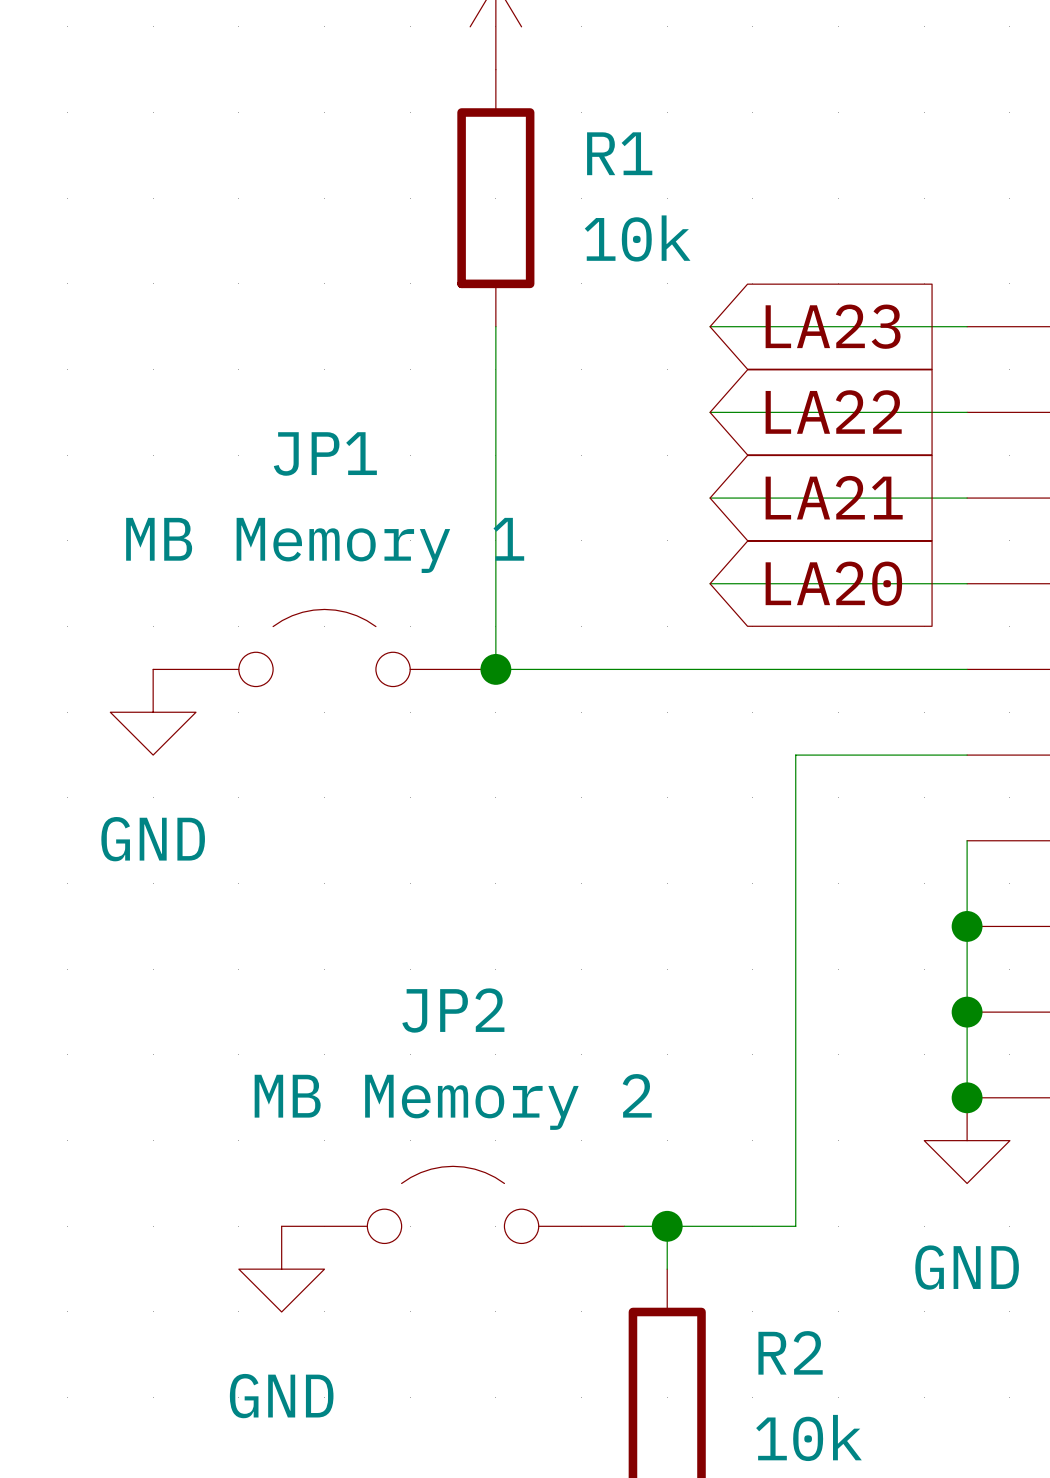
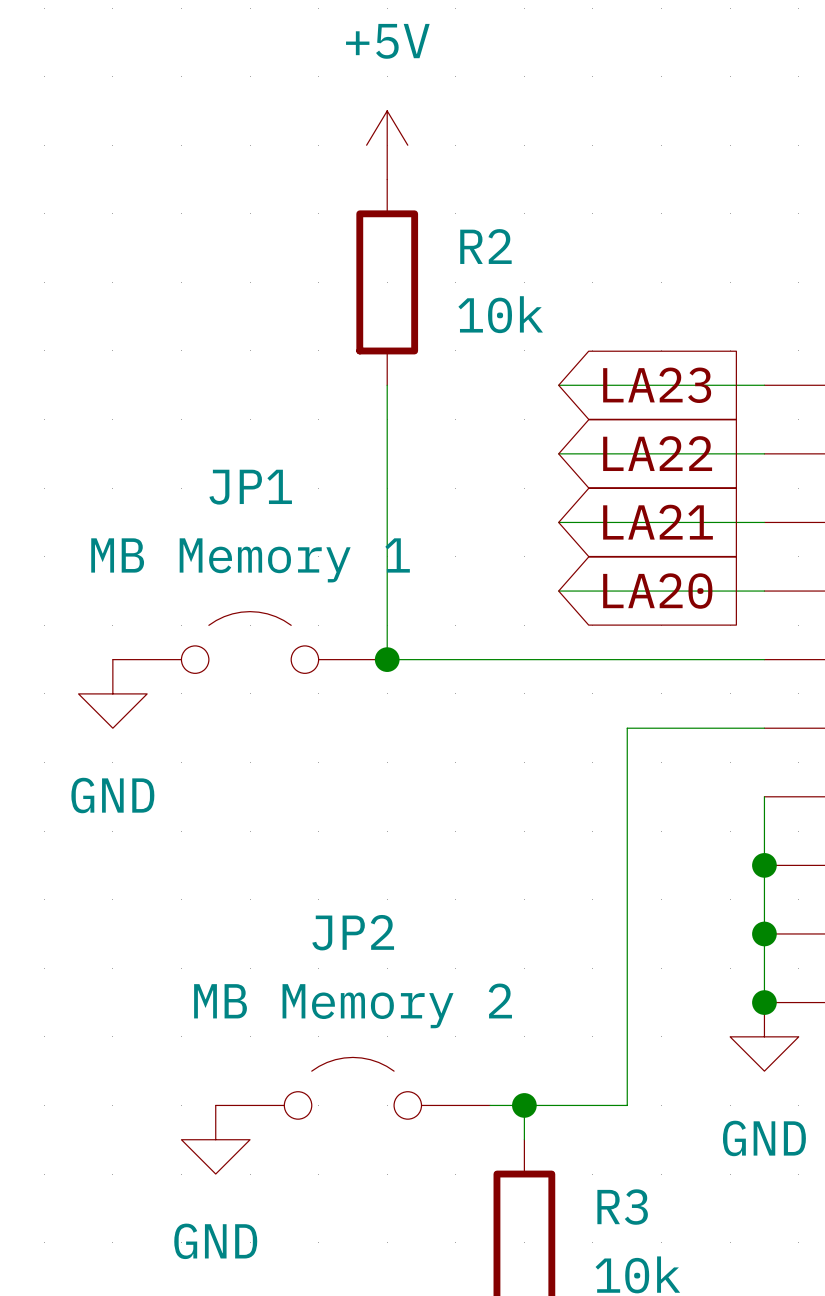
R1 name: R1 (619, 153) -> R2 (485, 246)
R2 name: R2 (790, 1352) -> R3 (622, 1207)

